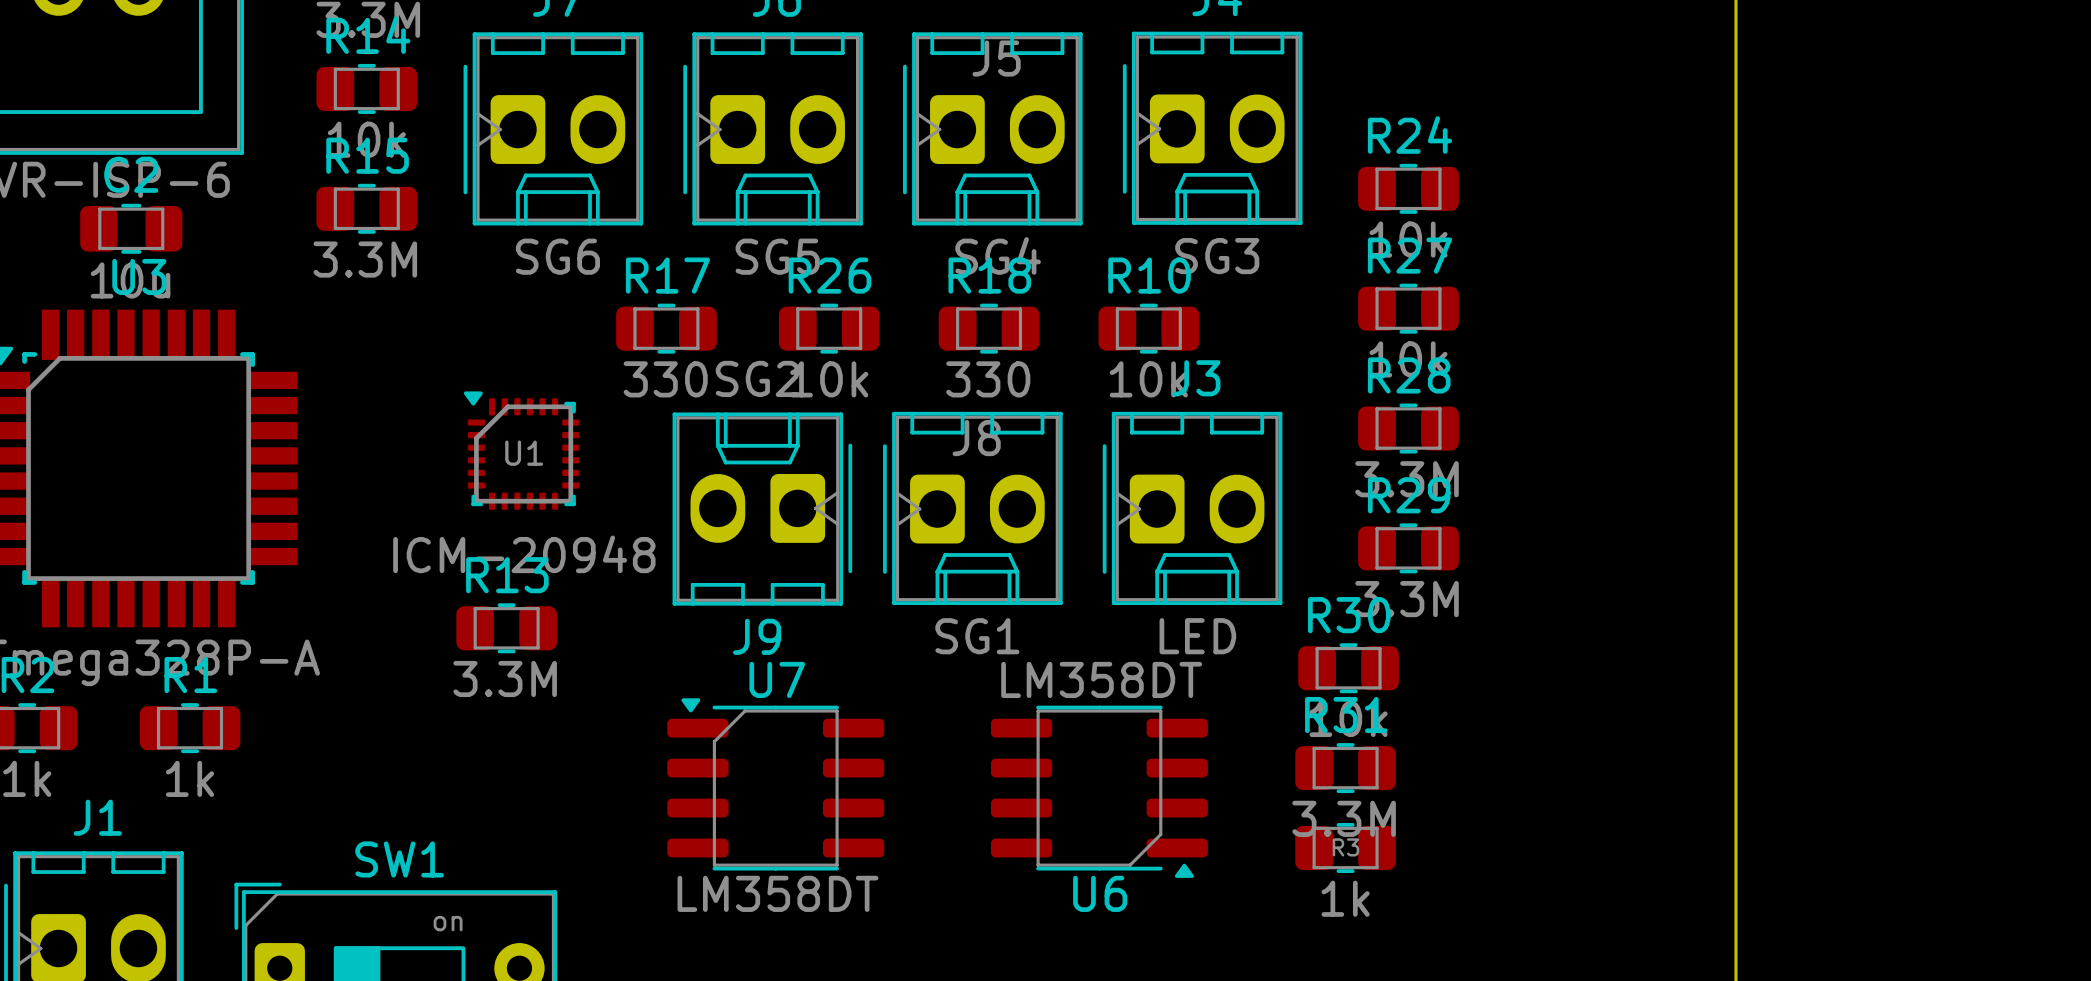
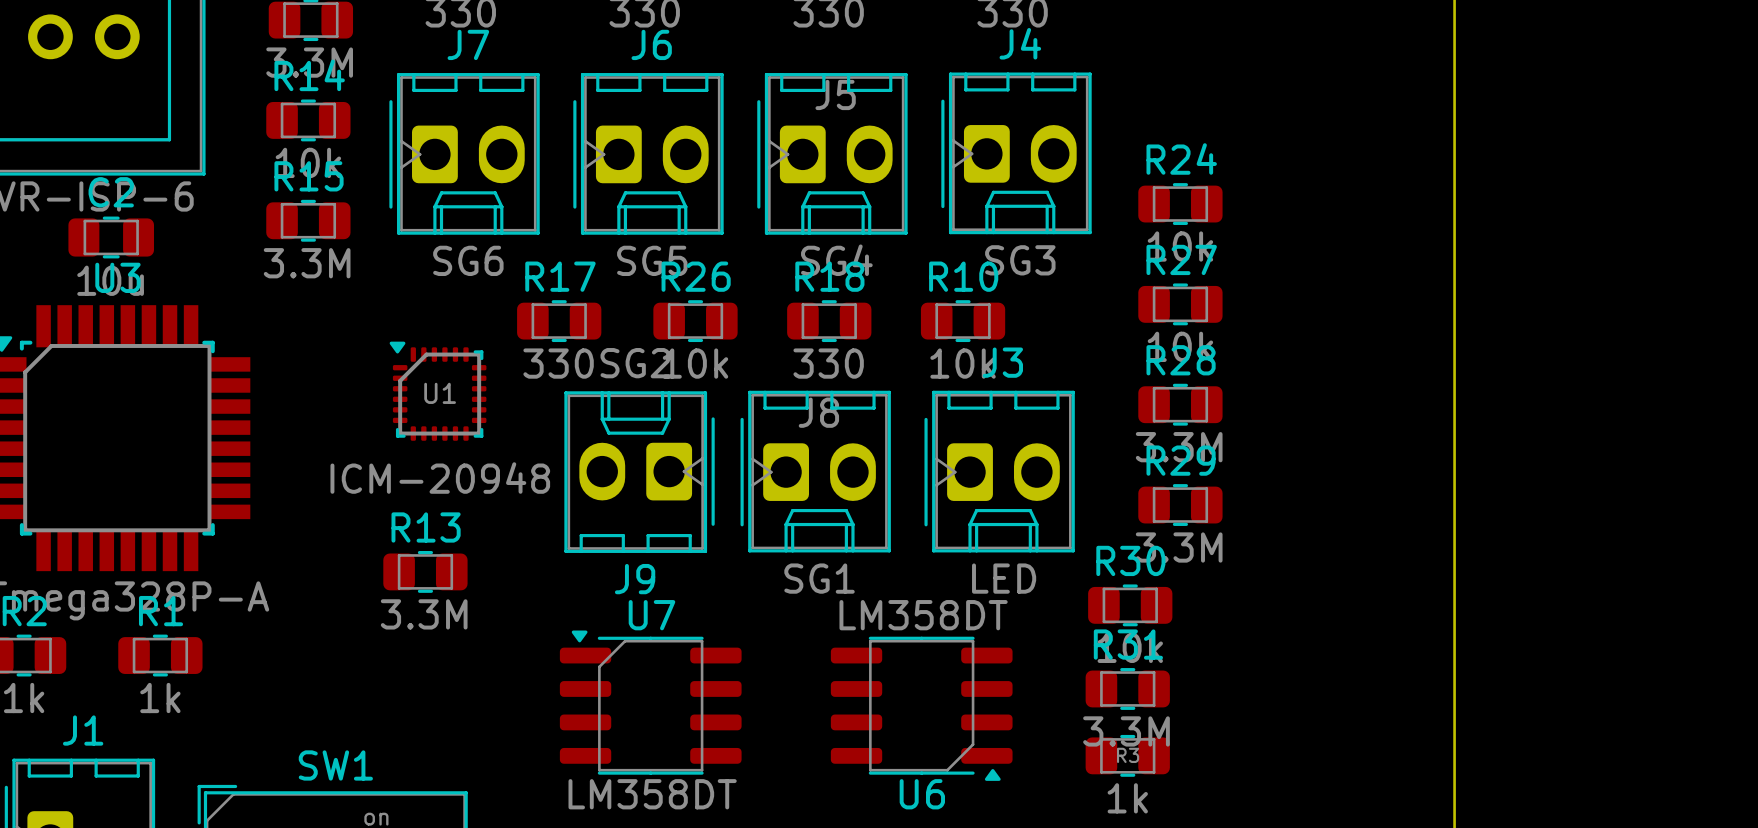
U1 position: (521, 450) -> (438, 391)

